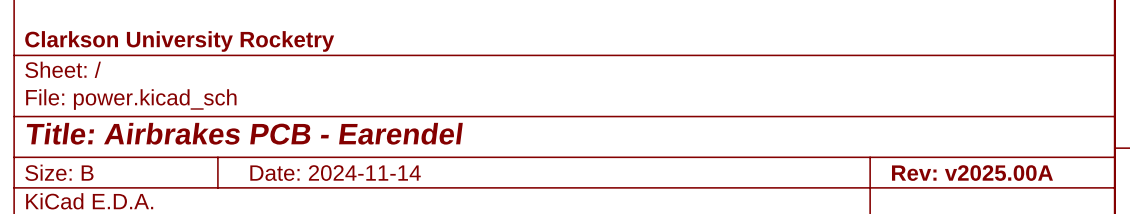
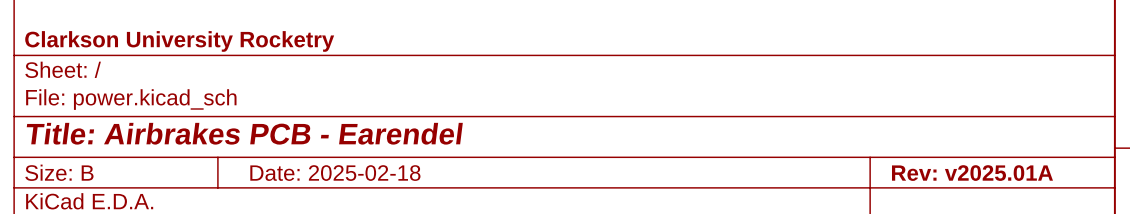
title block: Date: 2024-11-14 (335, 173) -> Date: 2025-02-18 (335, 173)
title block: Rev: v2025.00A (972, 173) -> Rev: v2025.01A (972, 173)

